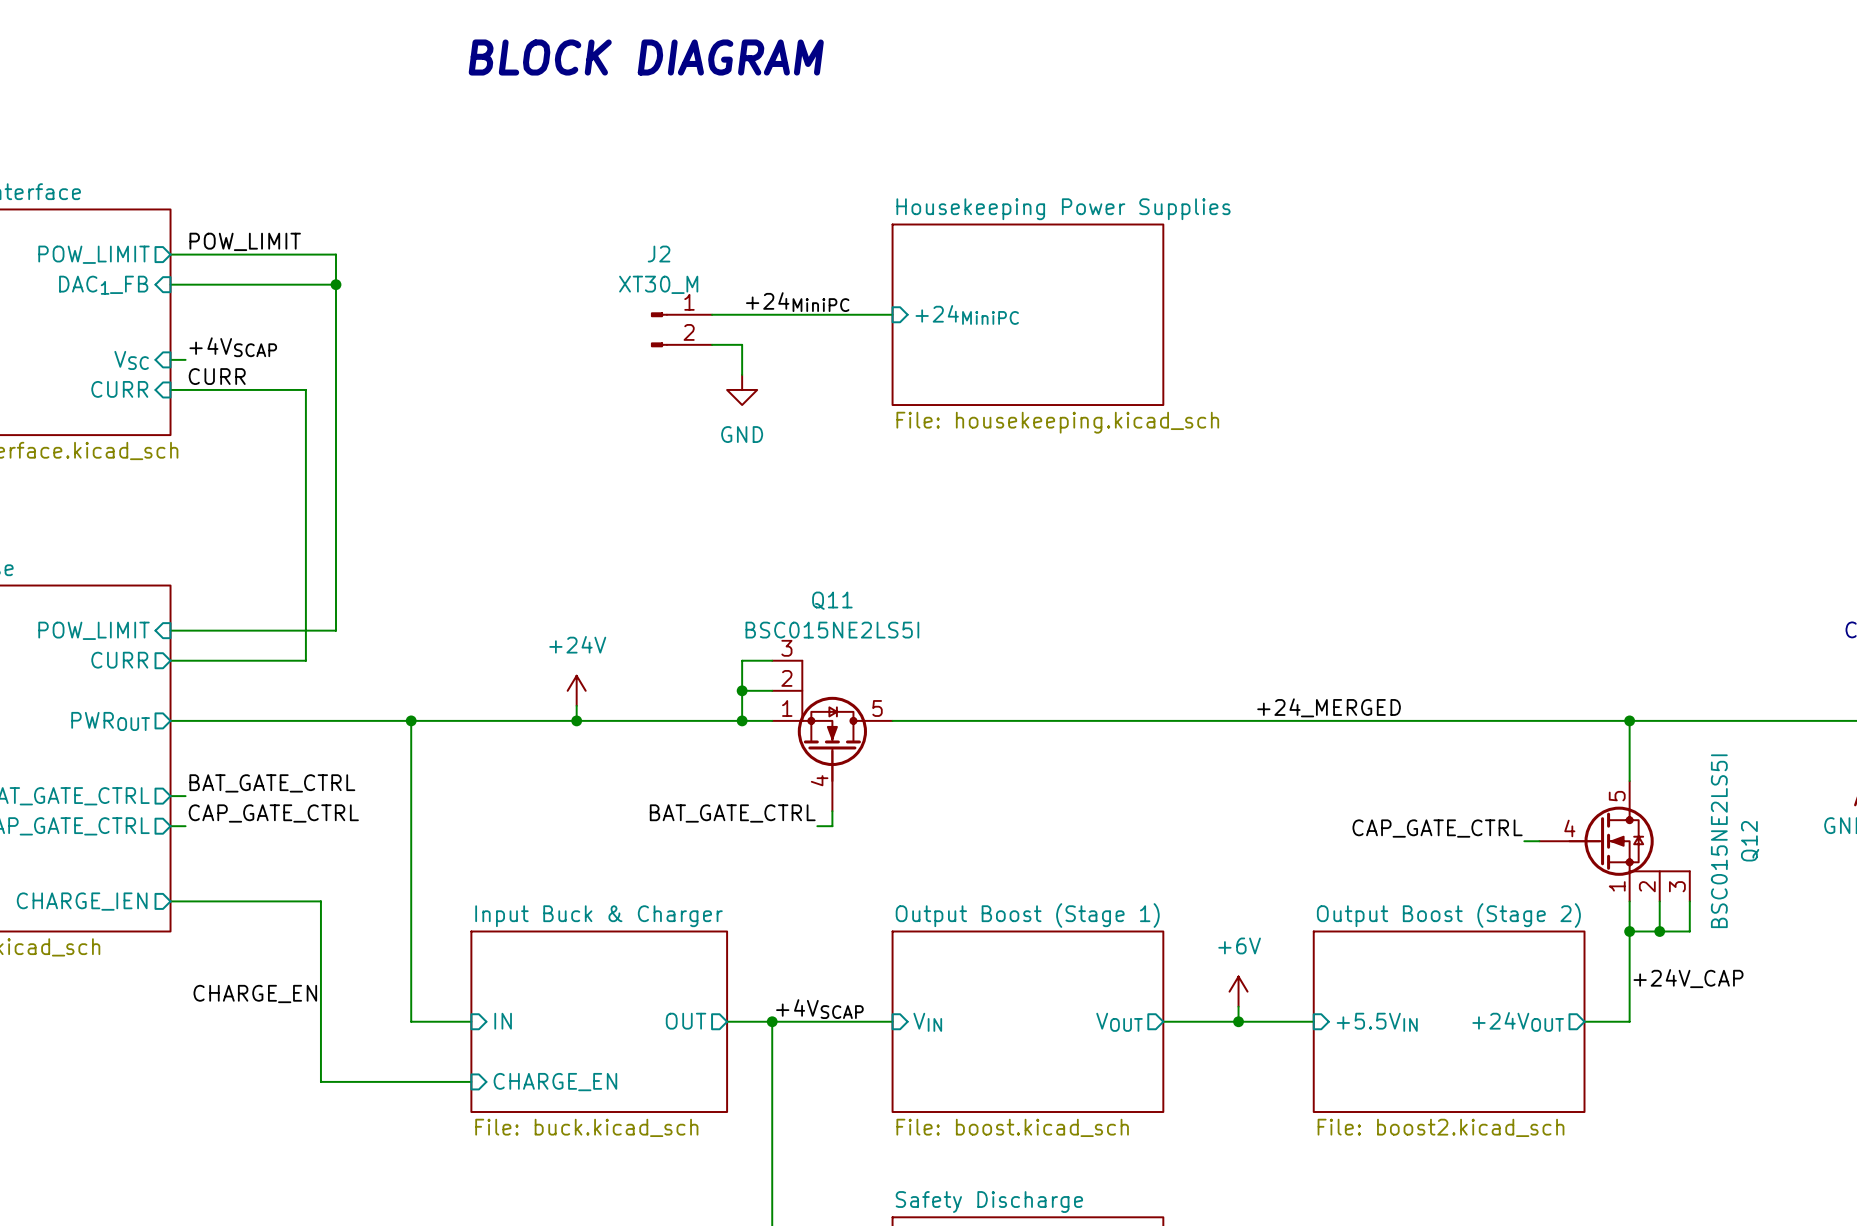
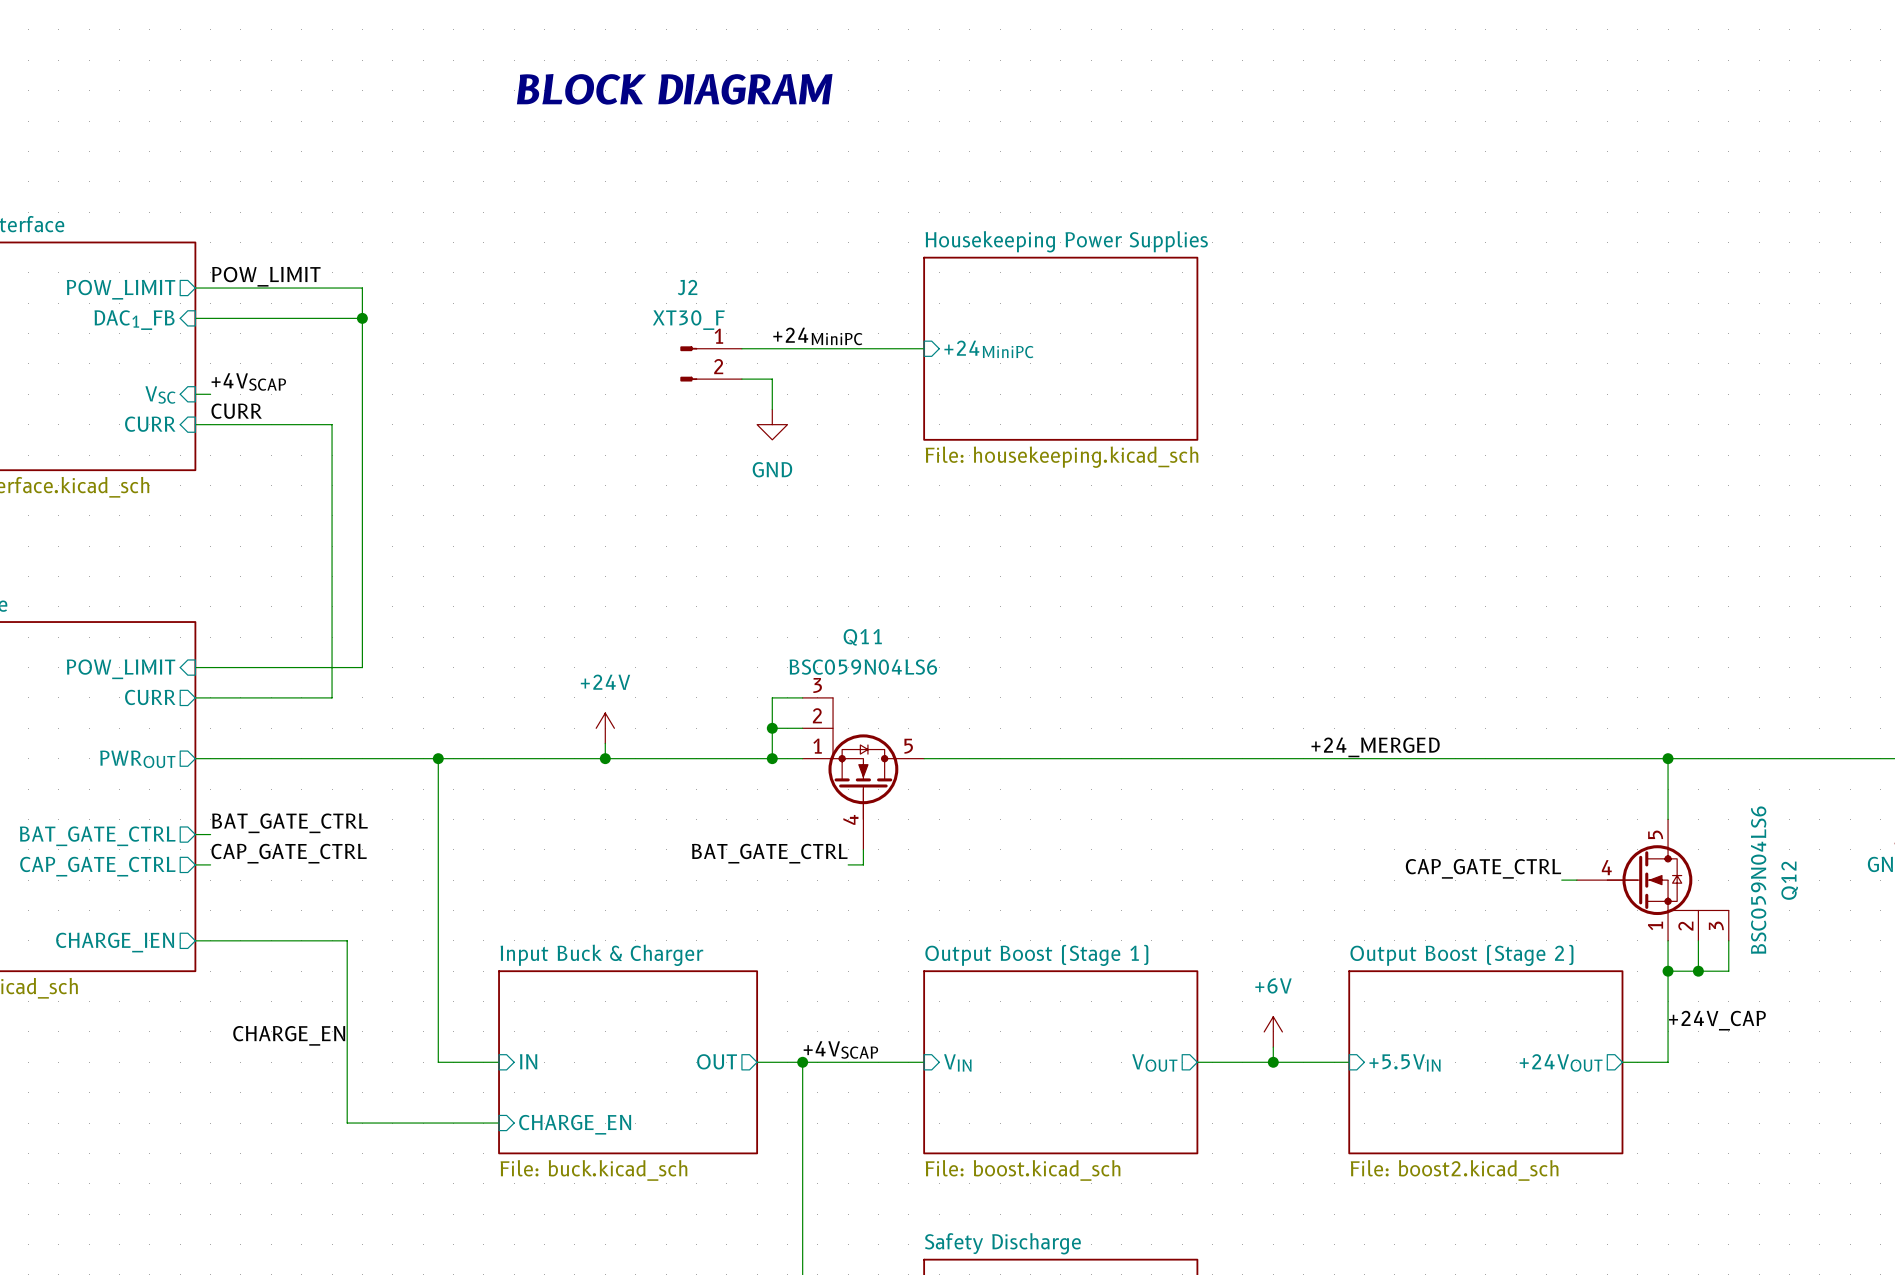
J2 value: XT30_M (658, 284) -> XT30_F (688, 320)
Q11 value: BSC015NE2LS5I (832, 630) -> BSC059N04LS6 (863, 667)
Q12 value: BSC015NE2LS5I (1719, 841) -> BSC059N04LS6 (1758, 880)

